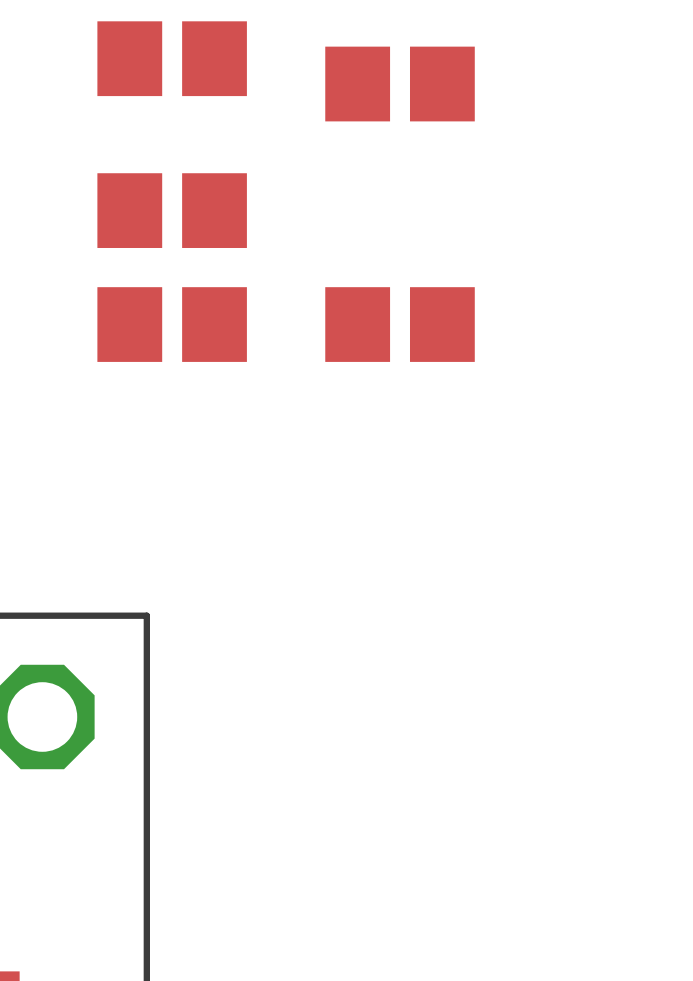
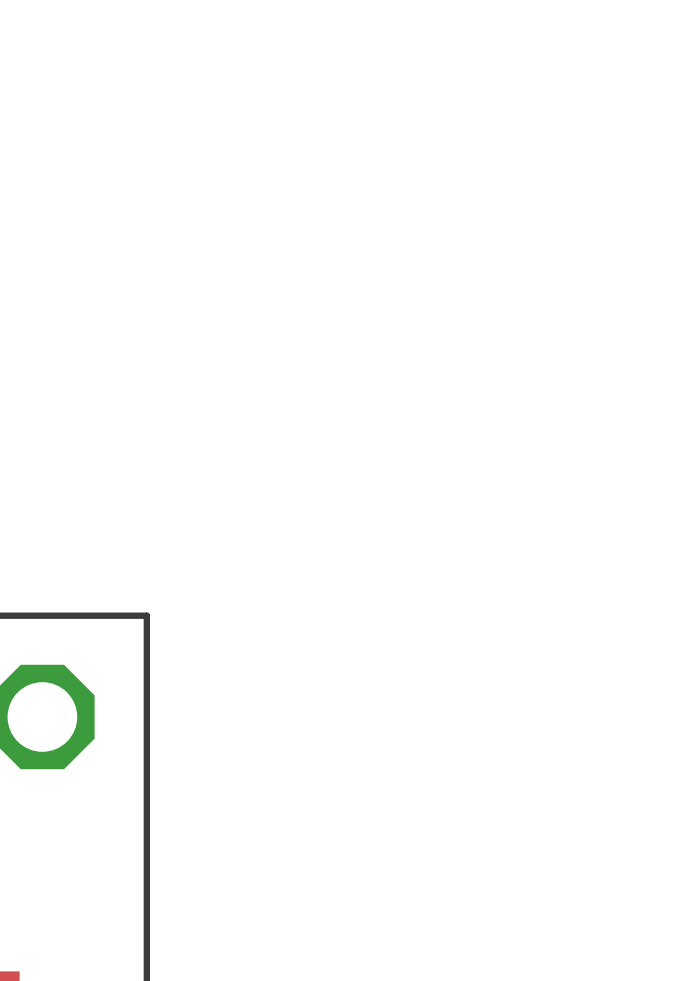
part: (172, 58) -> none
part: (400, 84) -> none
part: (172, 210) -> none
part: (172, 324) -> none
part: (400, 324) -> none

